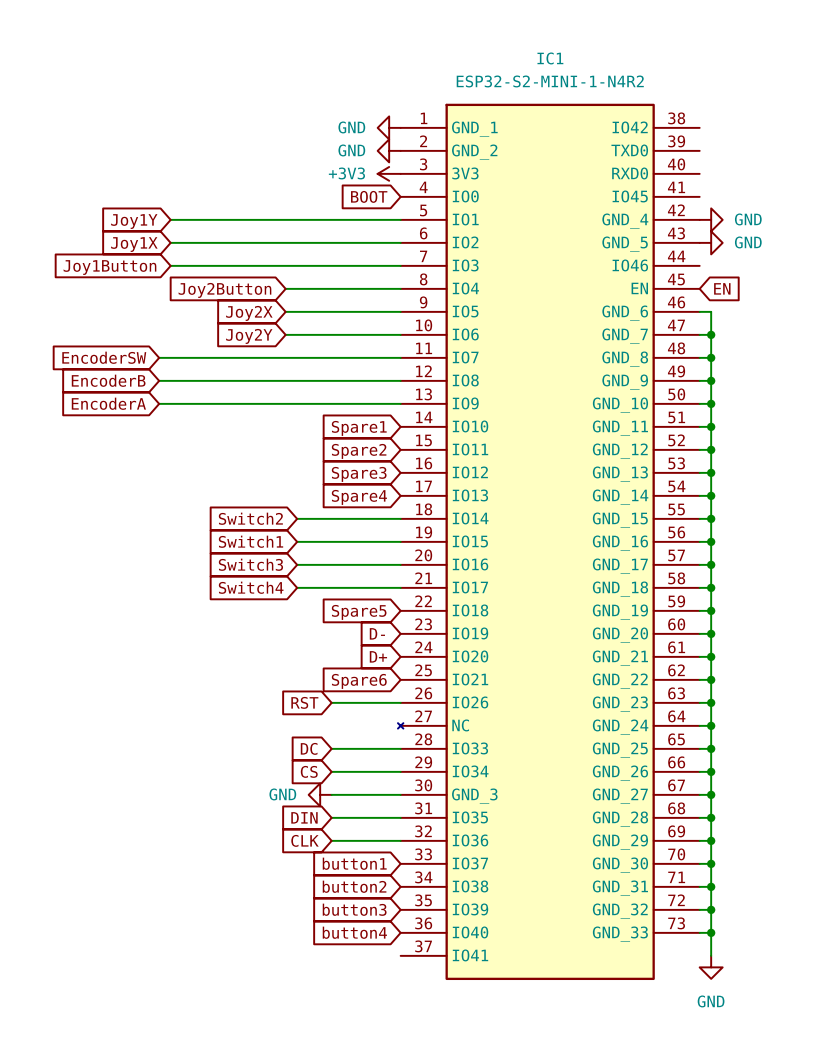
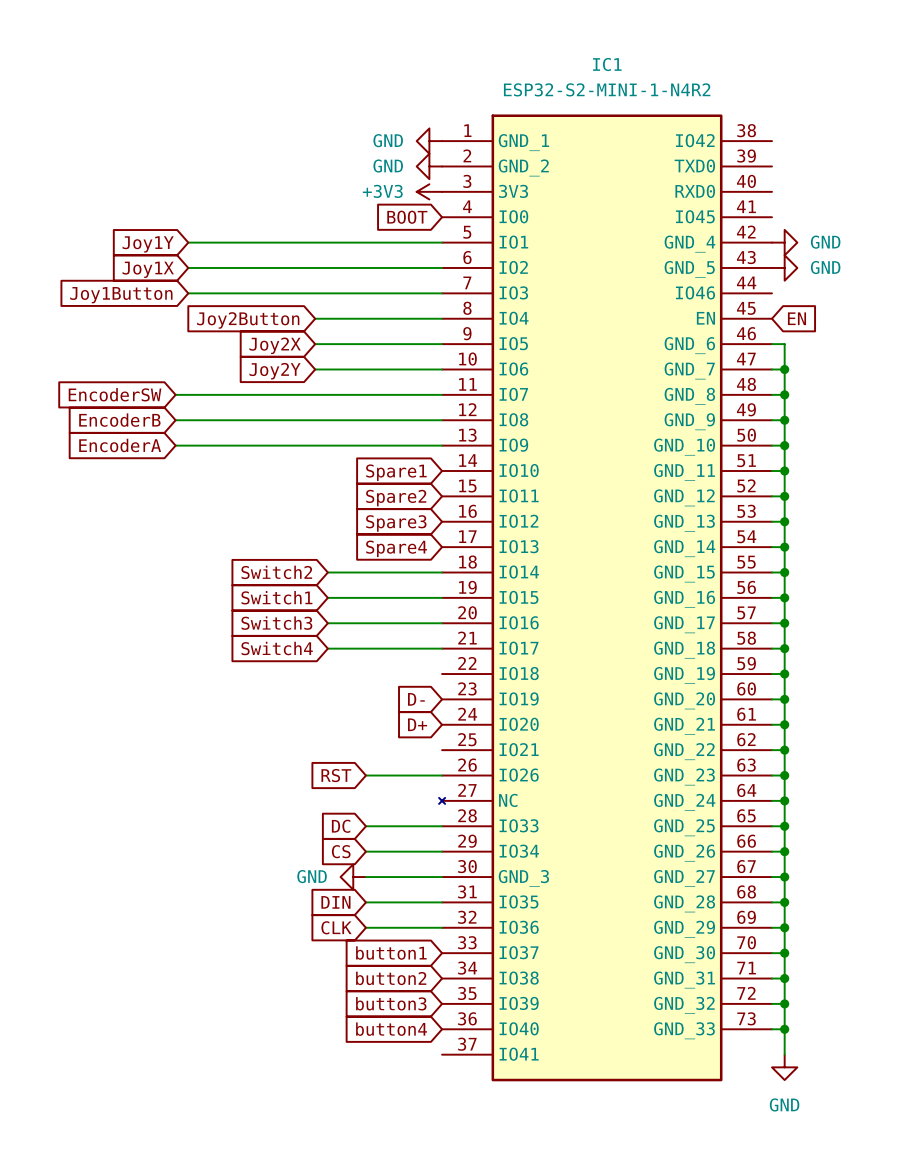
global label: Spare5 (359, 612) -> none
global label: Spare6 (359, 681) -> none

